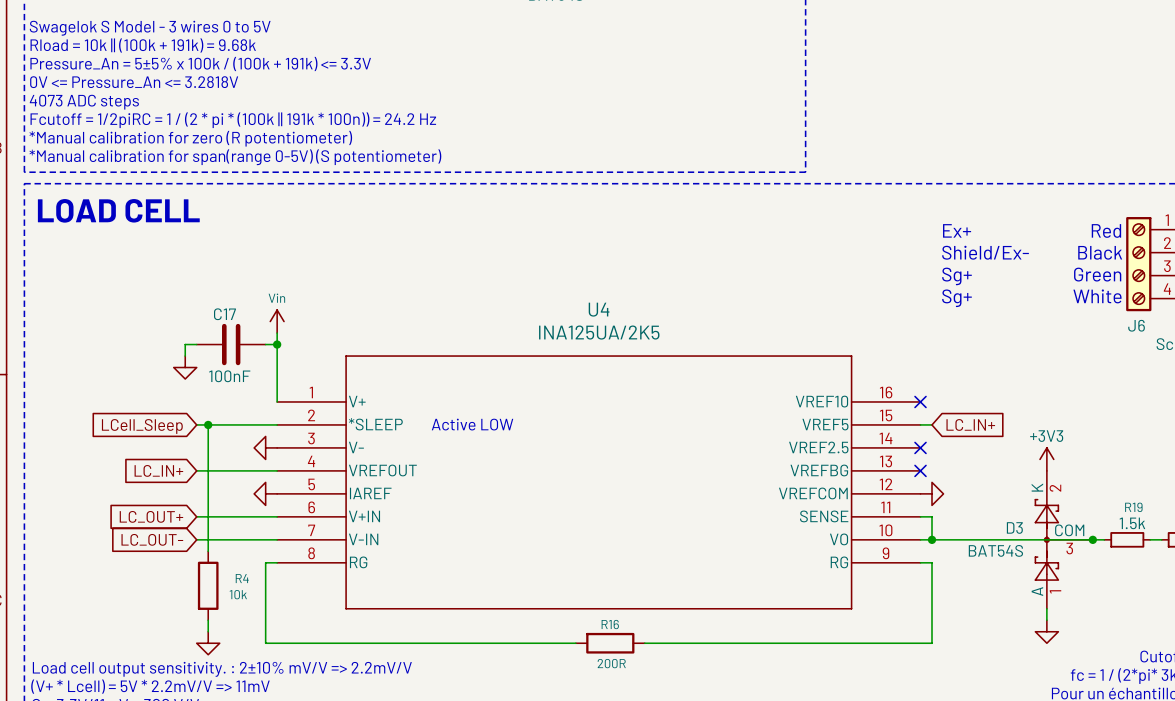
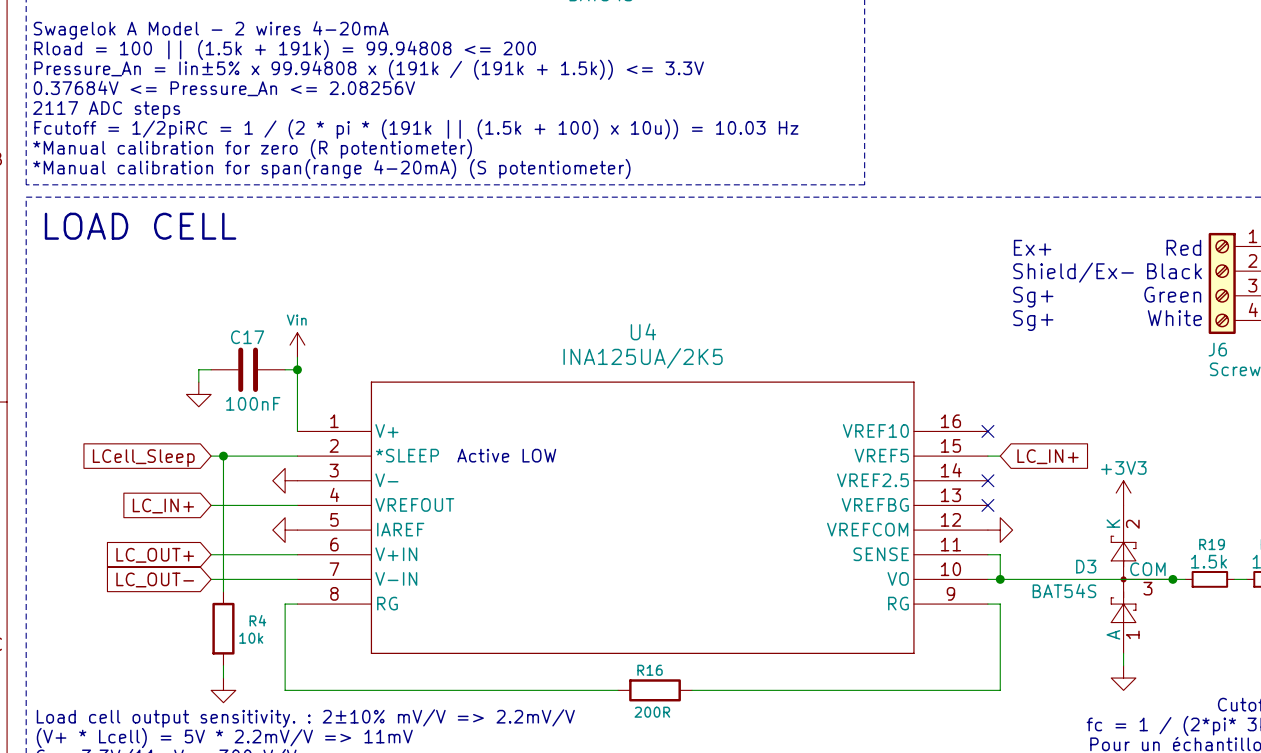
text: Swagelok S Model - 3 wires 0 to 5V (150, 28) -> Swagelok A Model - 2 wires 4-20mA (211, 30)
text: Rload = 10k || (100k + 191k) = 9.68k (143, 45) -> Rload = 100 || (1.5k + 191k) = 99.94808 <= 200 (285, 49)
text: Pressure_An = 5±5% x 100k / (100k + 191k) <= 3.3V (200, 63) -> Pressure_An = Iin±5% x 99.94808 x (191k / (191k + 1.5k)) <= 3.3V (369, 69)
text: 0V <= Pressure_An <= 3.2818V (134, 82) -> 0.37684V <= Pressure_An <= 2.08256V (224, 88)
text: 4073 ADC steps (84, 102) -> 2117 ADC steps (106, 110)
text: Fcutoff = 1/2piRC = 1 / (2 * pi * (100k || 191k * 100n)) = 24.2 Hz (233, 120) -> Fcutoff = 1/2piRC = 1 / (2 * pi * (191k || (1.5k + 100) x 10u)) = 10.03 Hz (416, 129)
text: *Manual calibration for span(range 0-5V) (S potentiometer) (235, 157) -> *Manual calibration for span(range 4-20mA) (S potentiometer) (331, 169)

